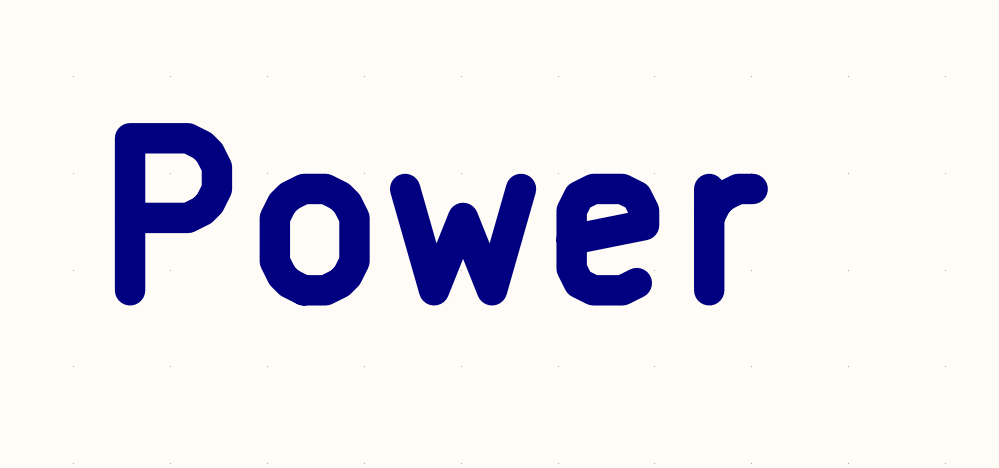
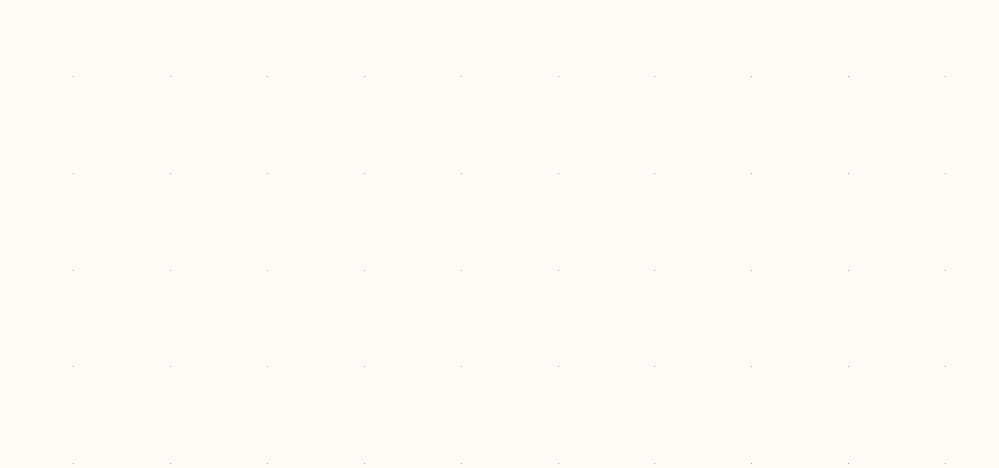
text: Power (441, 214) -> none

